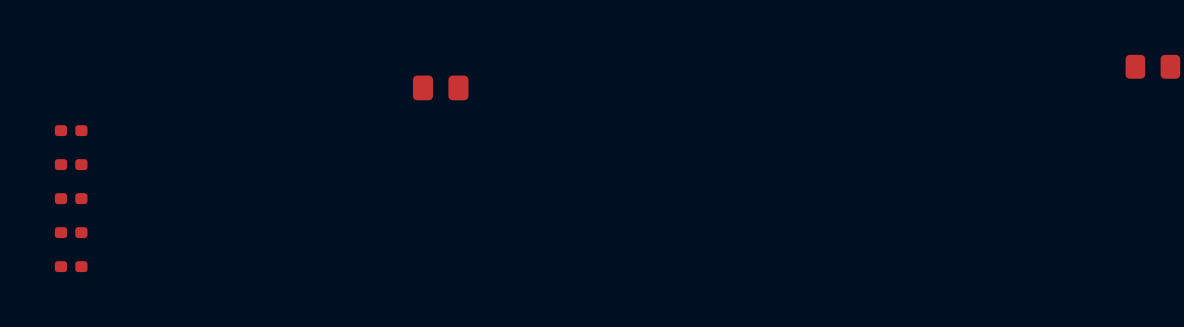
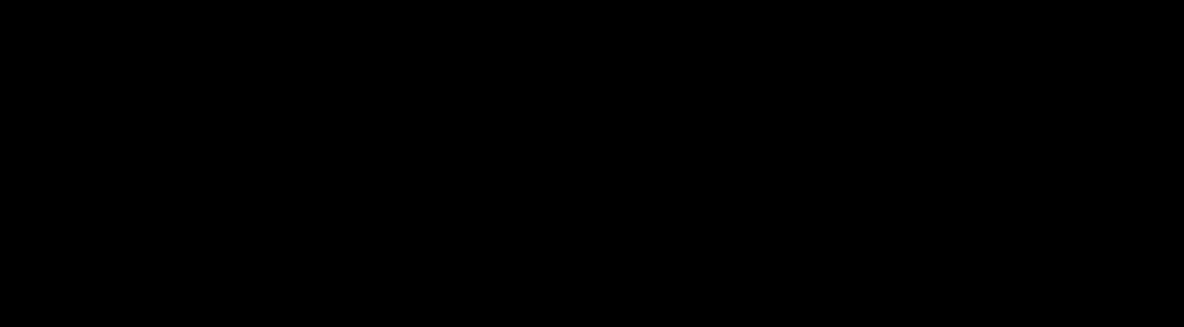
part: (1152, 66) -> none
part: (440, 87) -> none
part: (71, 130) -> none
part: (71, 164) -> none
part: (71, 198) -> none
part: (71, 232) -> none
part: (71, 266) -> none

